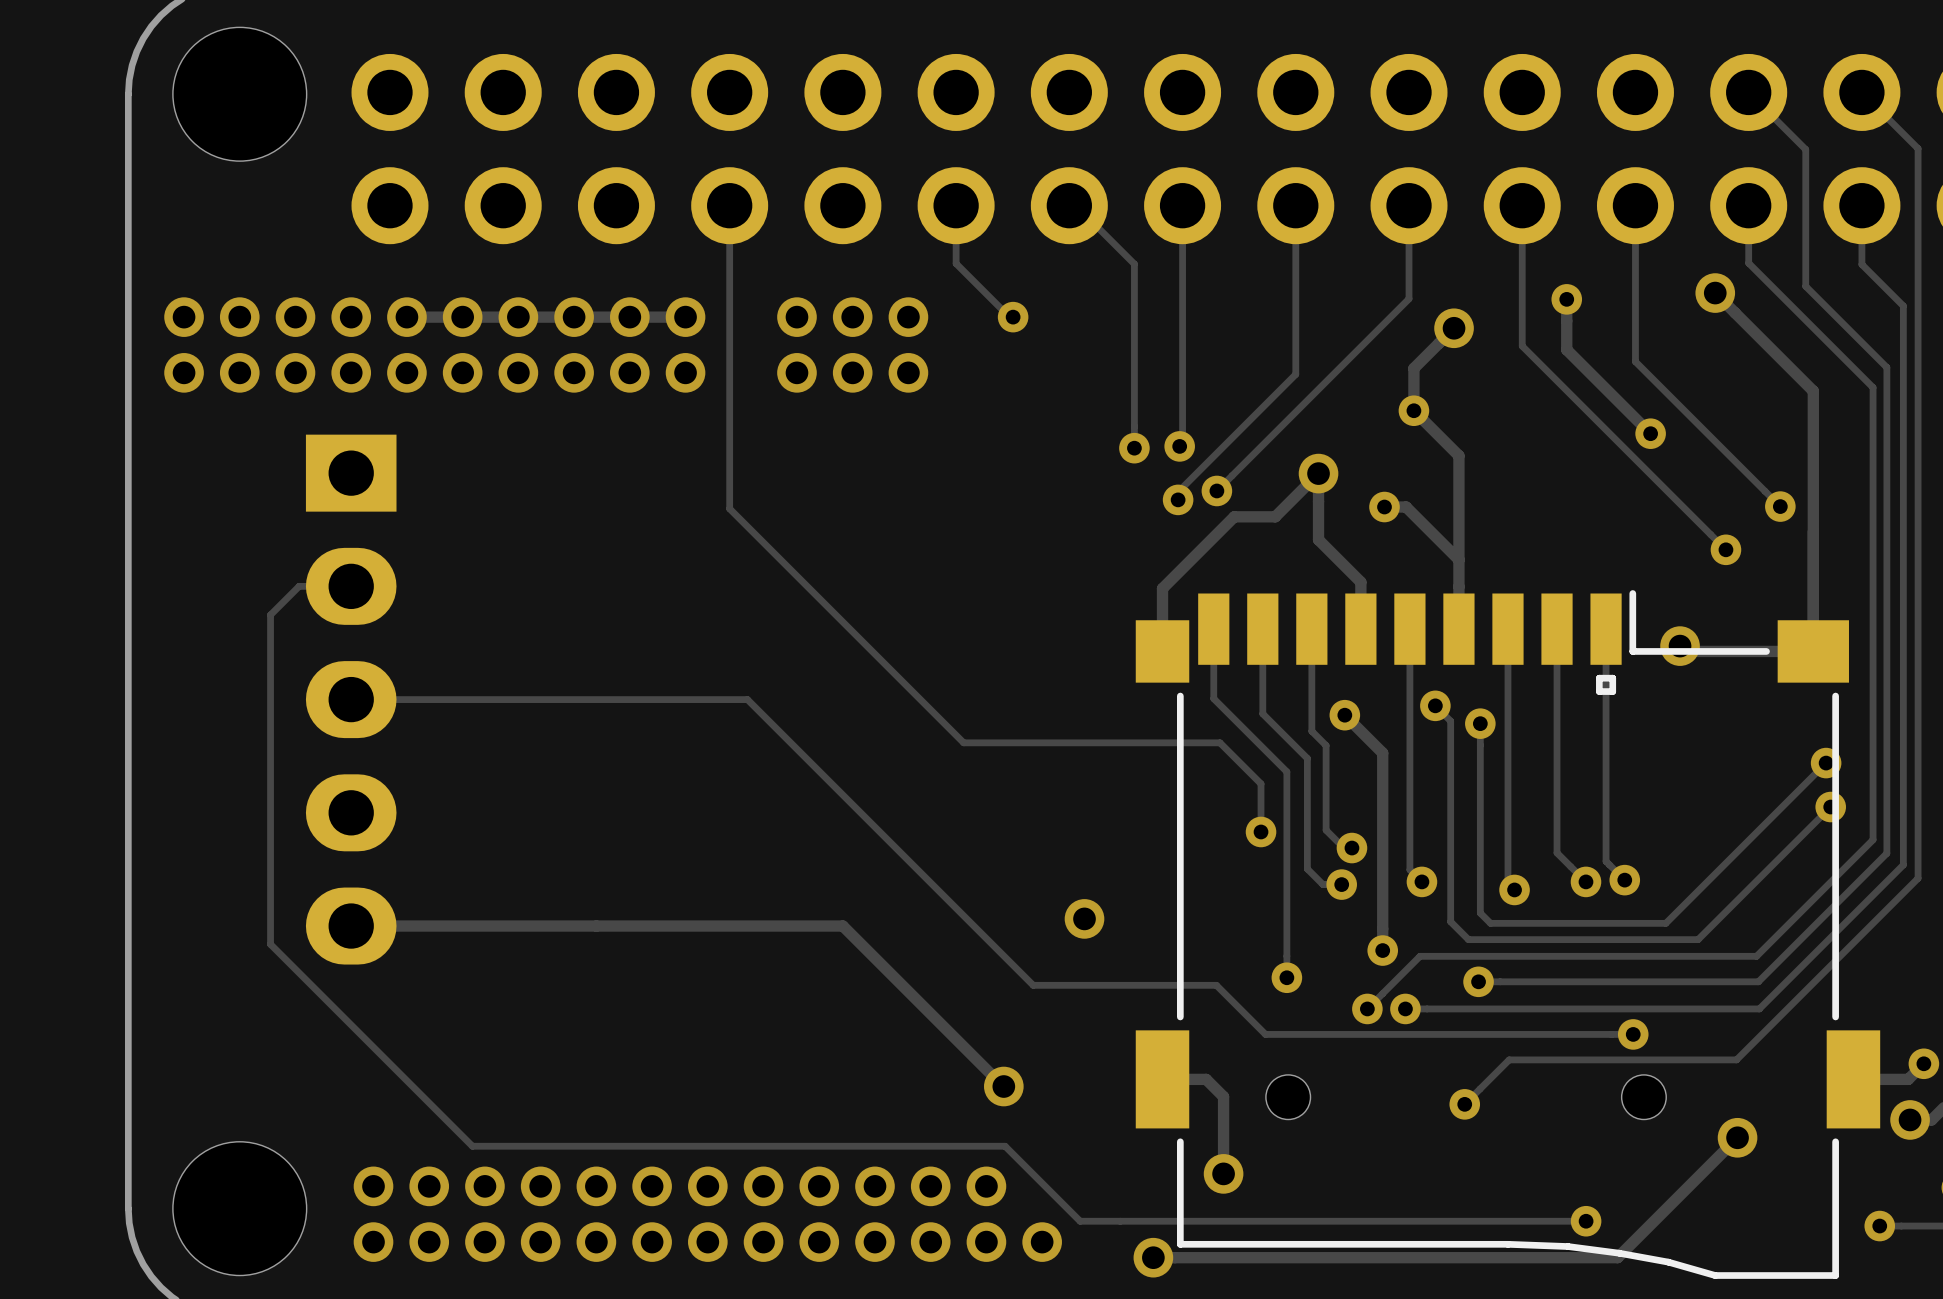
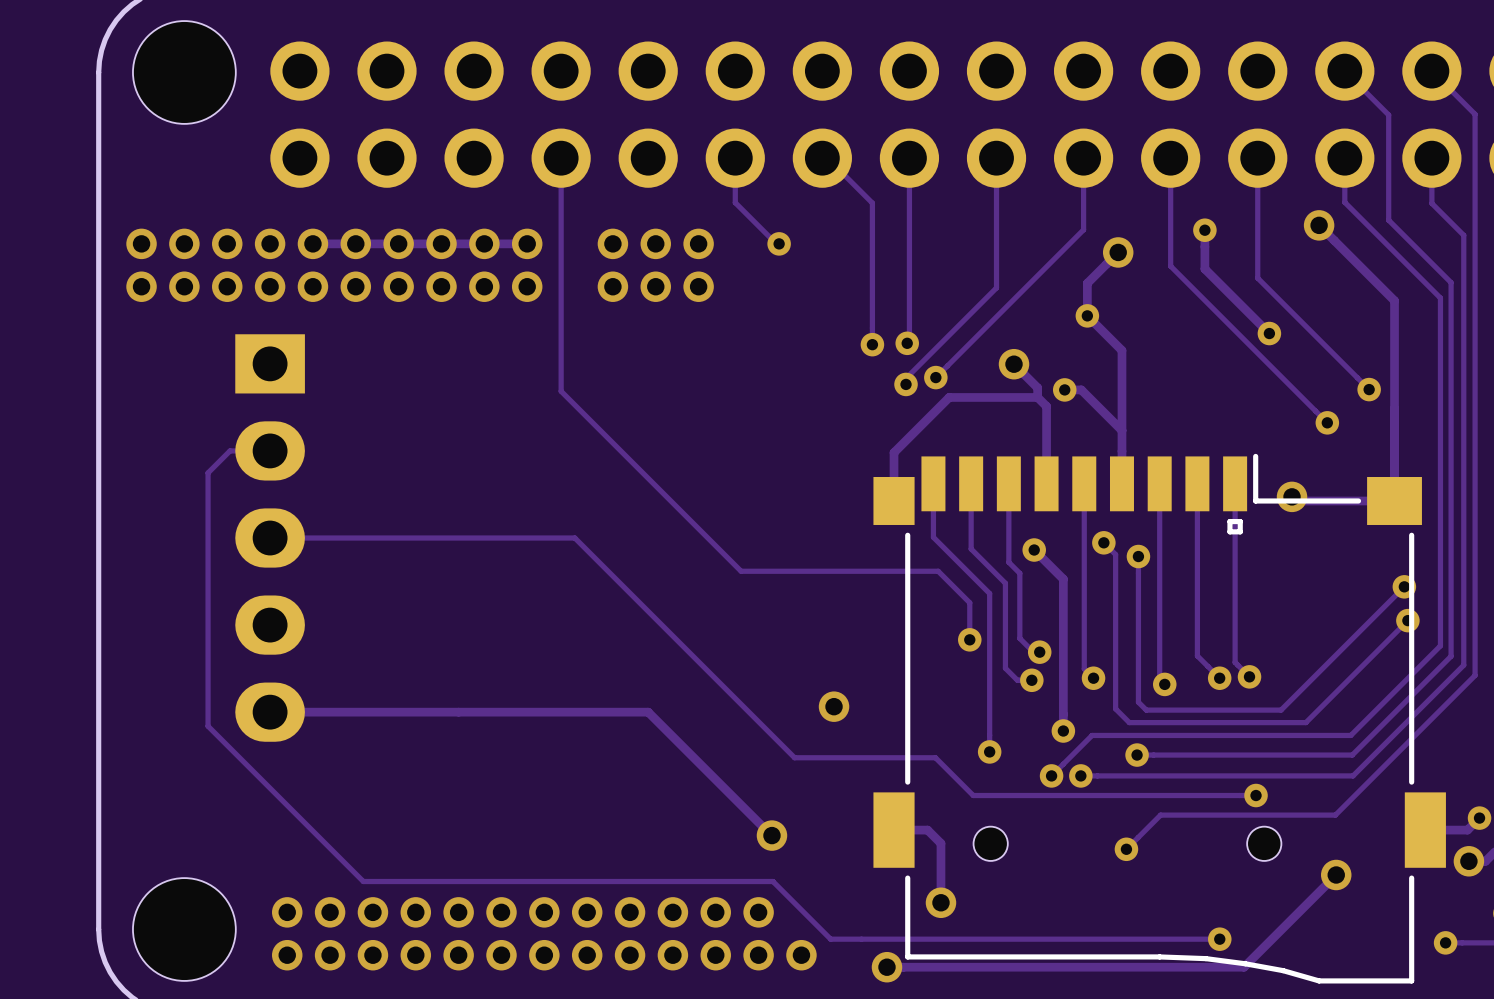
track: none -> (1014, 364) (1037, 387) (1037, 397)
track: (1275, 516) (1318, 473) (1318, 539) (1360, 582) -> (980, 397) (1037, 397)
track: none -> (1037, 397) (1046, 406) (1046, 447)

